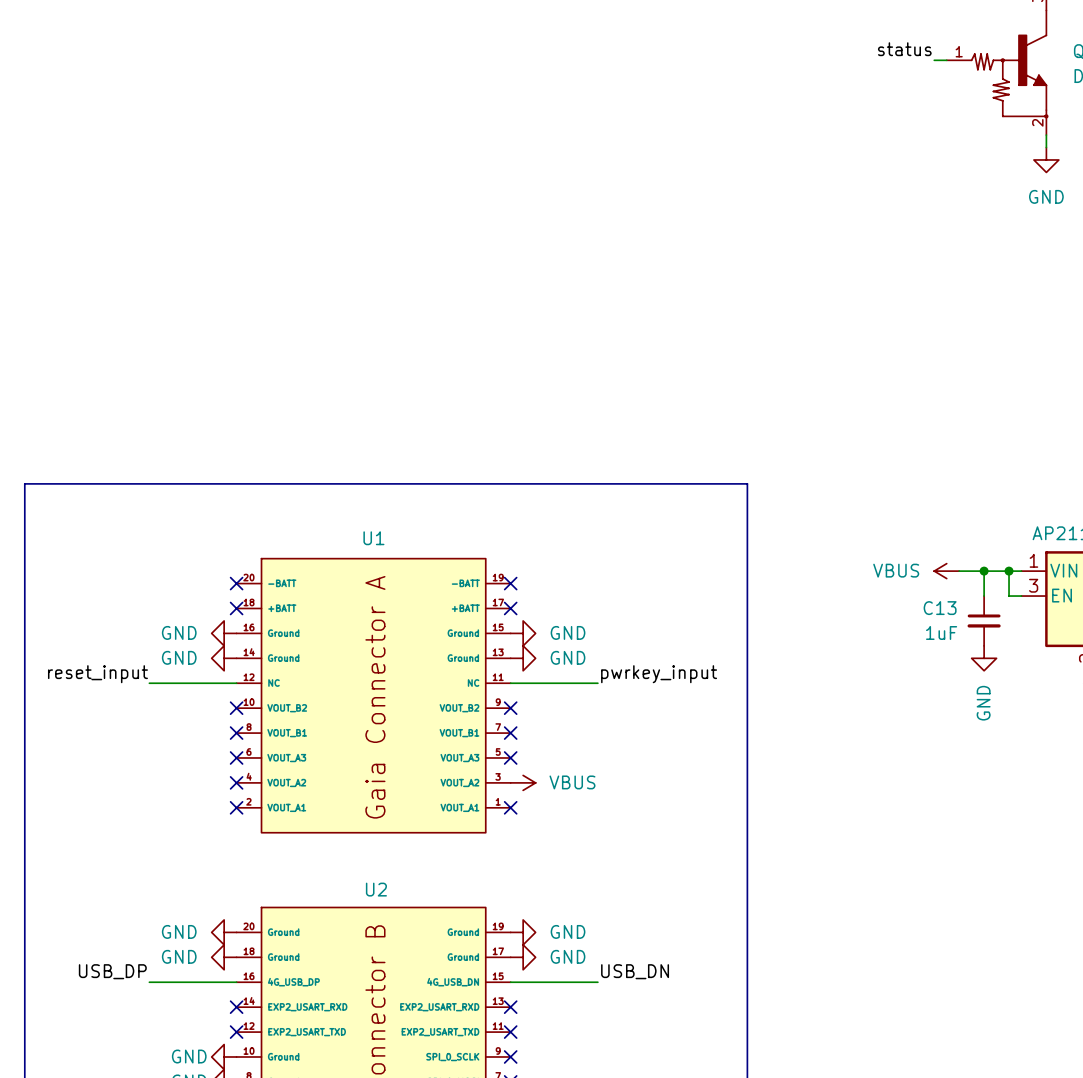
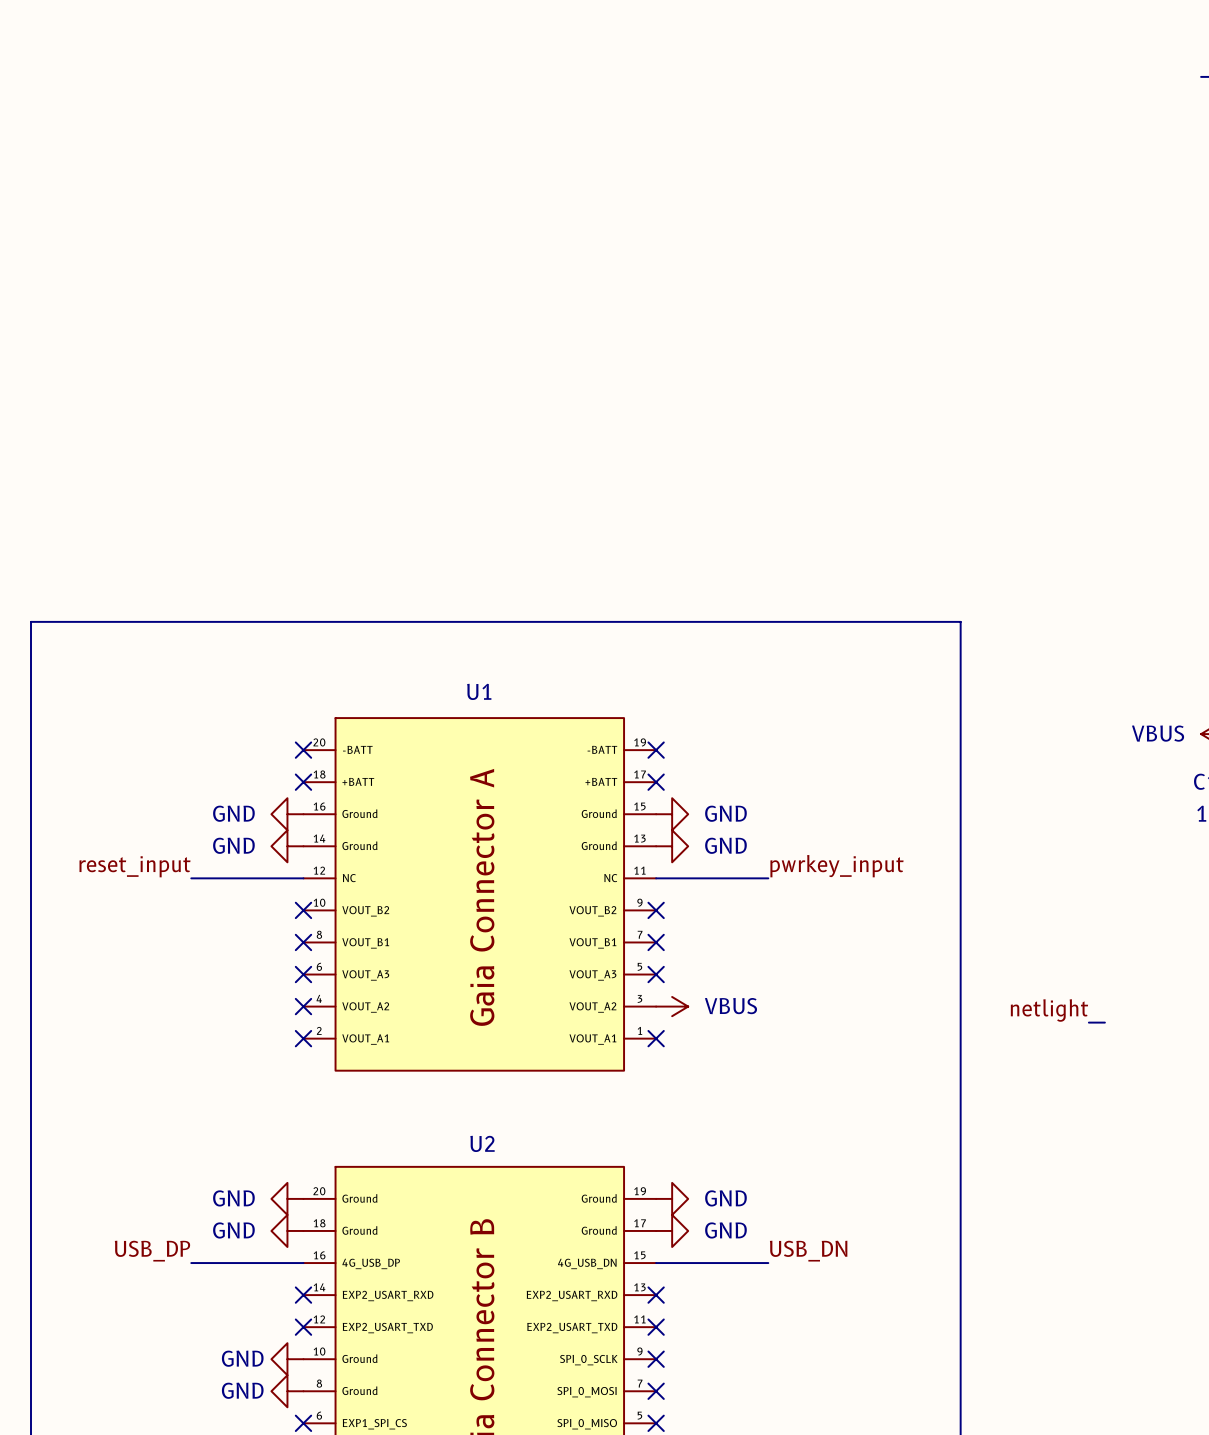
label: status (904, 49) -> none
label: none -> netlight (1049, 1010)
wire: none -> (1088, 1022) (1104, 1022)

